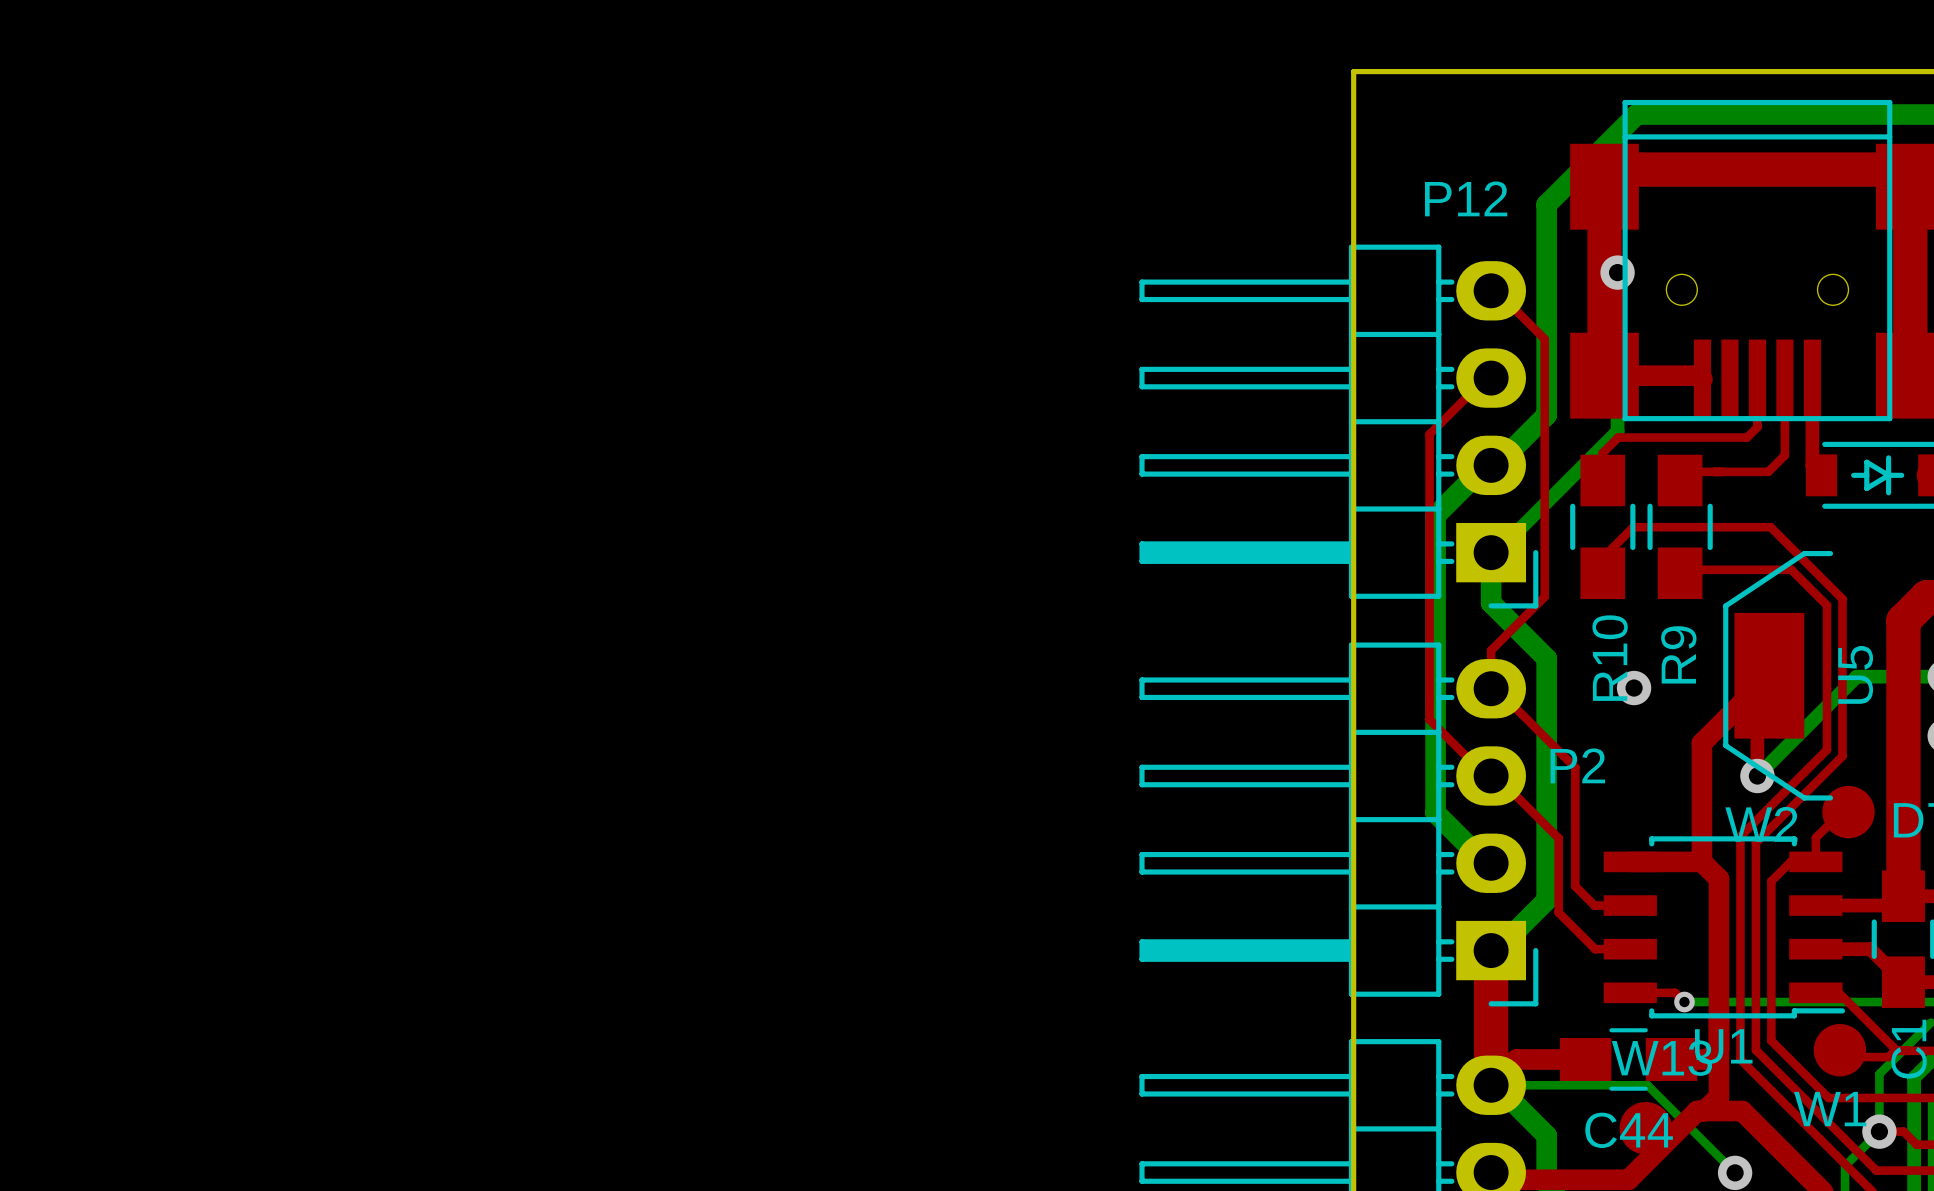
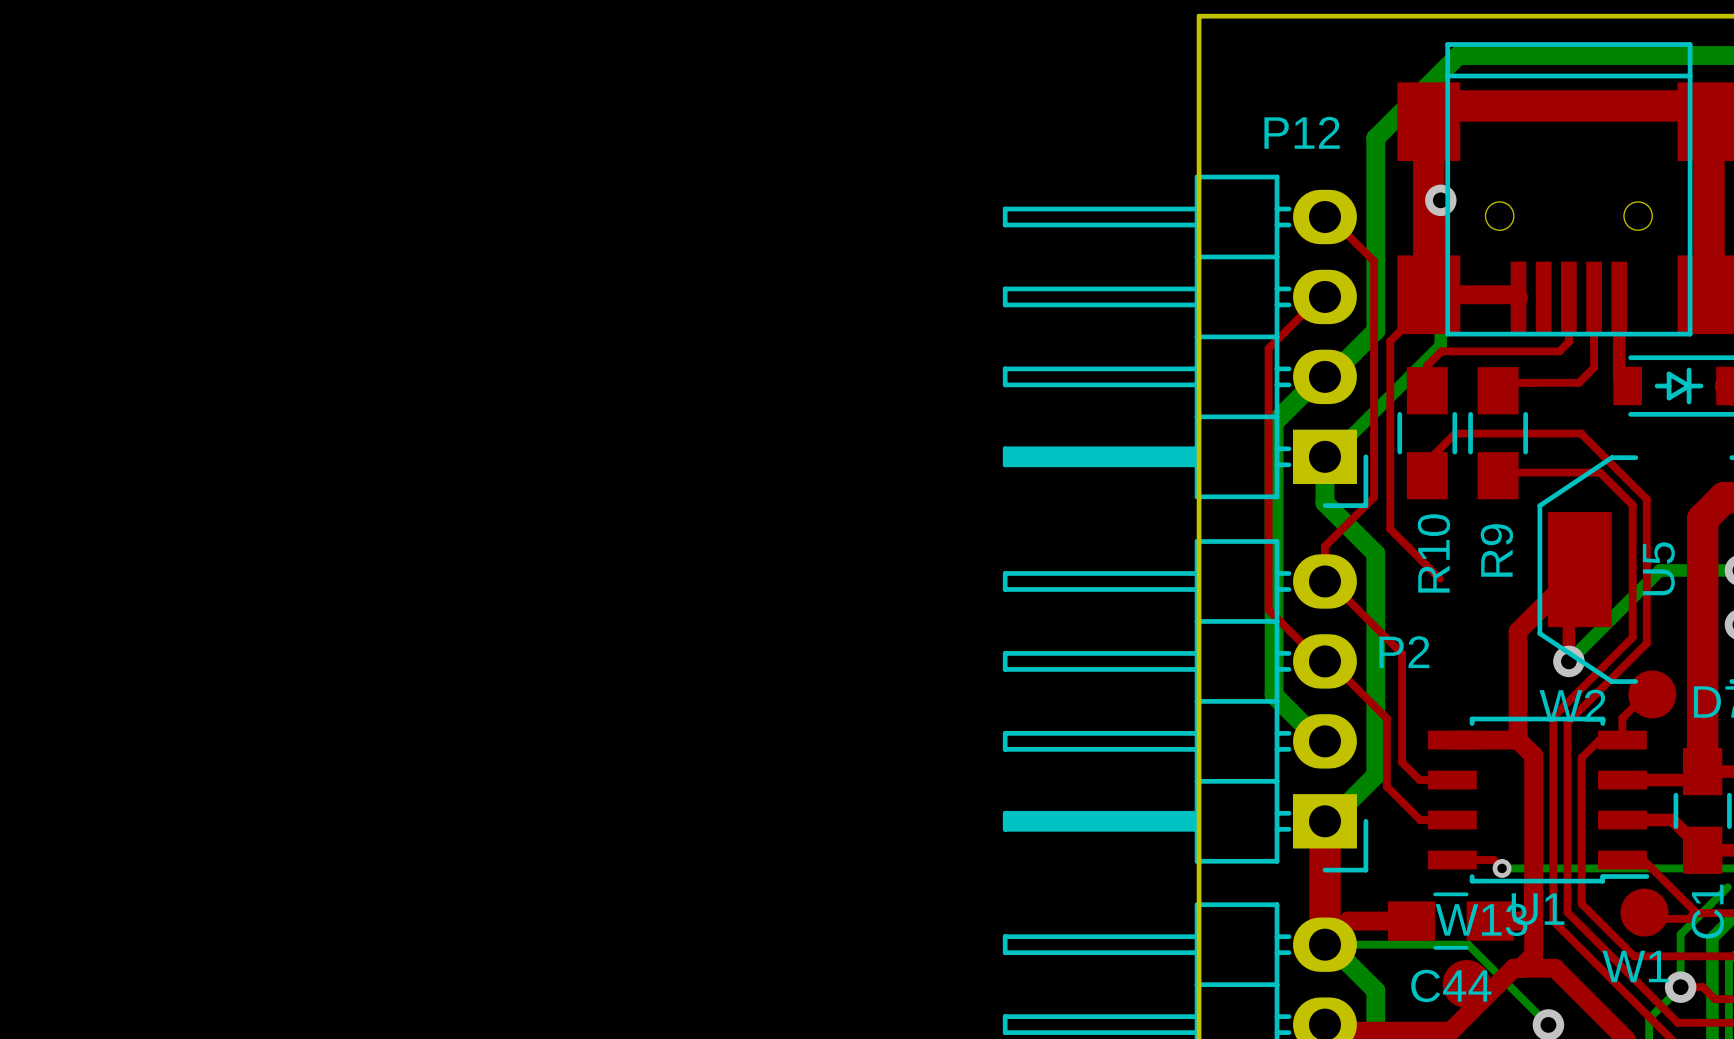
top track: none -> (1428, 294) (1428, 302) (1390, 341) (1390, 529) (1439, 578)
via: (1634, 688) -> none

